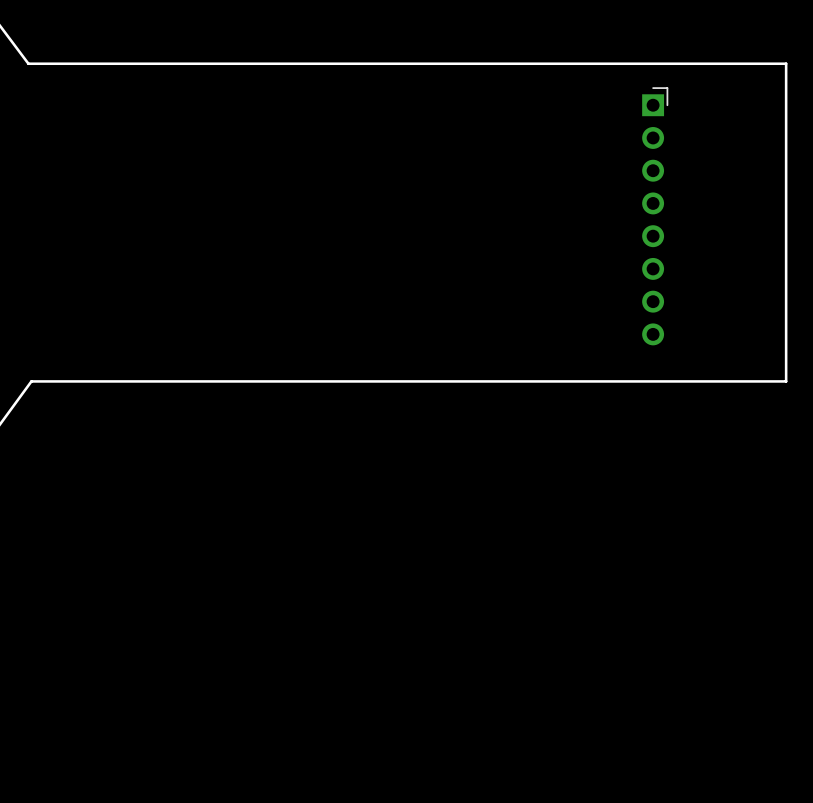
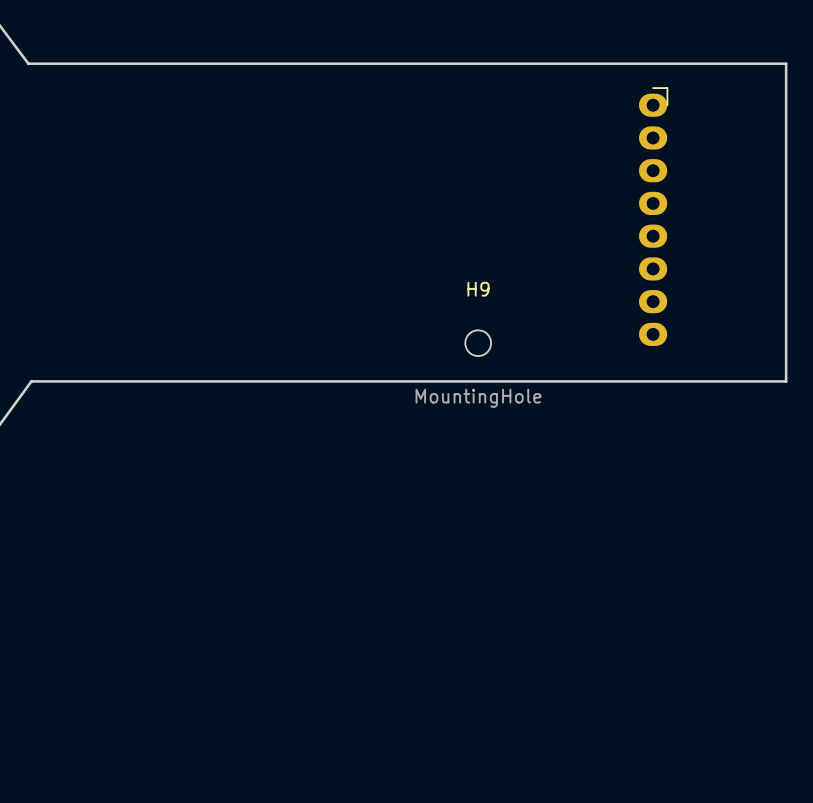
part footprint: [642, 87, 669, 346] -> [638, 87, 669, 346]
H9: none -> MountingHole (478, 343)

